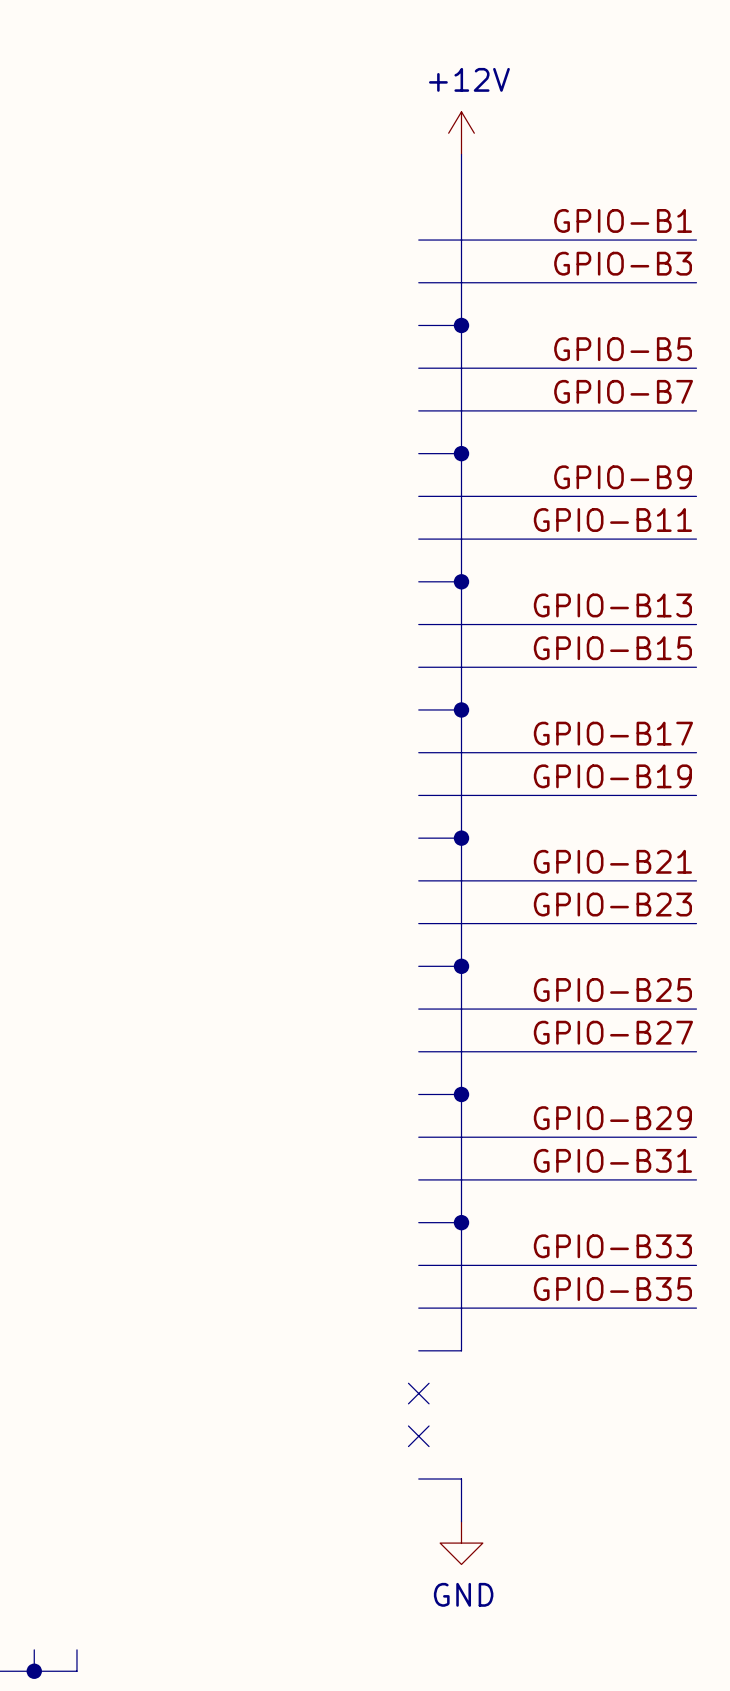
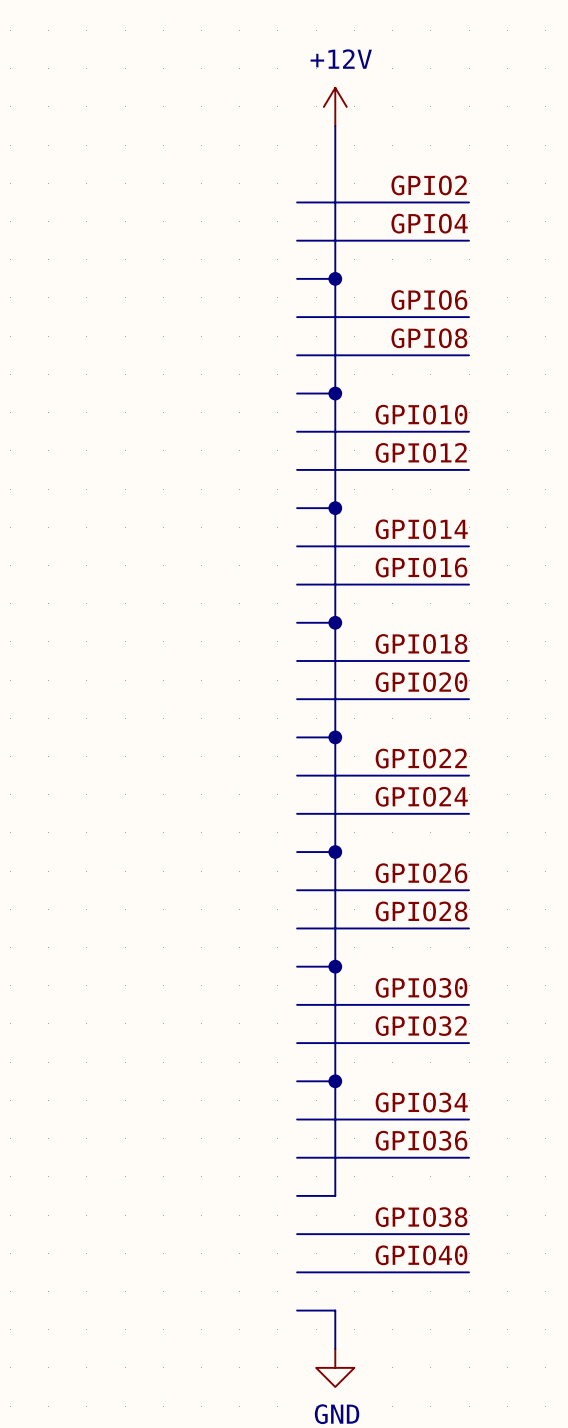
label: none -> GPIO2 (429, 185)
label: GPIO-B1 (623, 220) -> none
wire: (611, 240) (696, 240) -> none
label: none -> GPIO4 (429, 223)
label: GPIO-B3 (623, 263) -> none
wire: (611, 282) (696, 282) -> none
label: none -> GPIO6 (429, 300)
label: GPIO-B5 (623, 349) -> none
wire: (611, 368) (696, 368) -> none
label: none -> GPIO8 (429, 338)
label: GPIO-B7 (623, 391) -> none
wire: (611, 410) (696, 410) -> none
label: none -> GPIO10 (421, 414)
label: GPIO-B9 (623, 477) -> none
wire: (611, 496) (696, 496) -> none
label: none -> GPIO12 (421, 452)
label: GPIO-B11 (612, 520) -> none
wire: (611, 539) (696, 539) -> none
label: none -> GPIO14 (421, 529)
label: GPIO-B13 (612, 605) -> none
wire: (611, 624) (696, 624) -> none
label: none -> GPIO16 (421, 567)
label: GPIO-B15 (612, 648) -> none
wire: (611, 667) (696, 667) -> none
label: none -> GPIO18 (421, 643)
label: GPIO-B17 (613, 733) -> none
wire: (611, 752) (696, 752) -> none
label: none -> GPIO20 (421, 682)
label: GPIO-B19 (612, 776) -> none
wire: (611, 795) (696, 795) -> none
label: none -> GPIO22 (421, 758)
label: GPIO-B21 (612, 861) -> none
wire: (611, 880) (696, 880) -> none
label: none -> GPIO24 (421, 796)
label: GPIO-B23 (612, 904) -> none
wire: (611, 923) (696, 923) -> none
label: none -> GPIO26 (421, 873)
label: GPIO-B25 (612, 989) -> none
wire: (611, 1009) (696, 1009) -> none
label: none -> GPIO28 (421, 911)
label: GPIO-B27 (613, 1032) -> none
wire: (611, 1051) (696, 1051) -> none
label: none -> GPIO30 (421, 987)
label: GPIO-B29 (612, 1118) -> none
wire: (611, 1137) (696, 1137) -> none
label: none -> GPIO32 (421, 1026)
label: GPIO-B31 (612, 1160) -> none
wire: (611, 1179) (696, 1179) -> none
label: none -> GPIO34 (421, 1102)
label: GPIO-B33 (612, 1246) -> none
wire: (611, 1265) (696, 1265) -> none
label: none -> GPIO36 (421, 1140)
label: GPIO-B35 (612, 1289) -> none
wire: (611, 1308) (696, 1308) -> none
label: none -> GPIO38 (421, 1217)
wire: none -> (297, 1234) (469, 1234)
no-connect mark: (418, 1393) -> none
label: none -> GPIO40 (421, 1255)
wire: none -> (297, 1272) (469, 1272)
no-connect mark: (418, 1436) -> none

